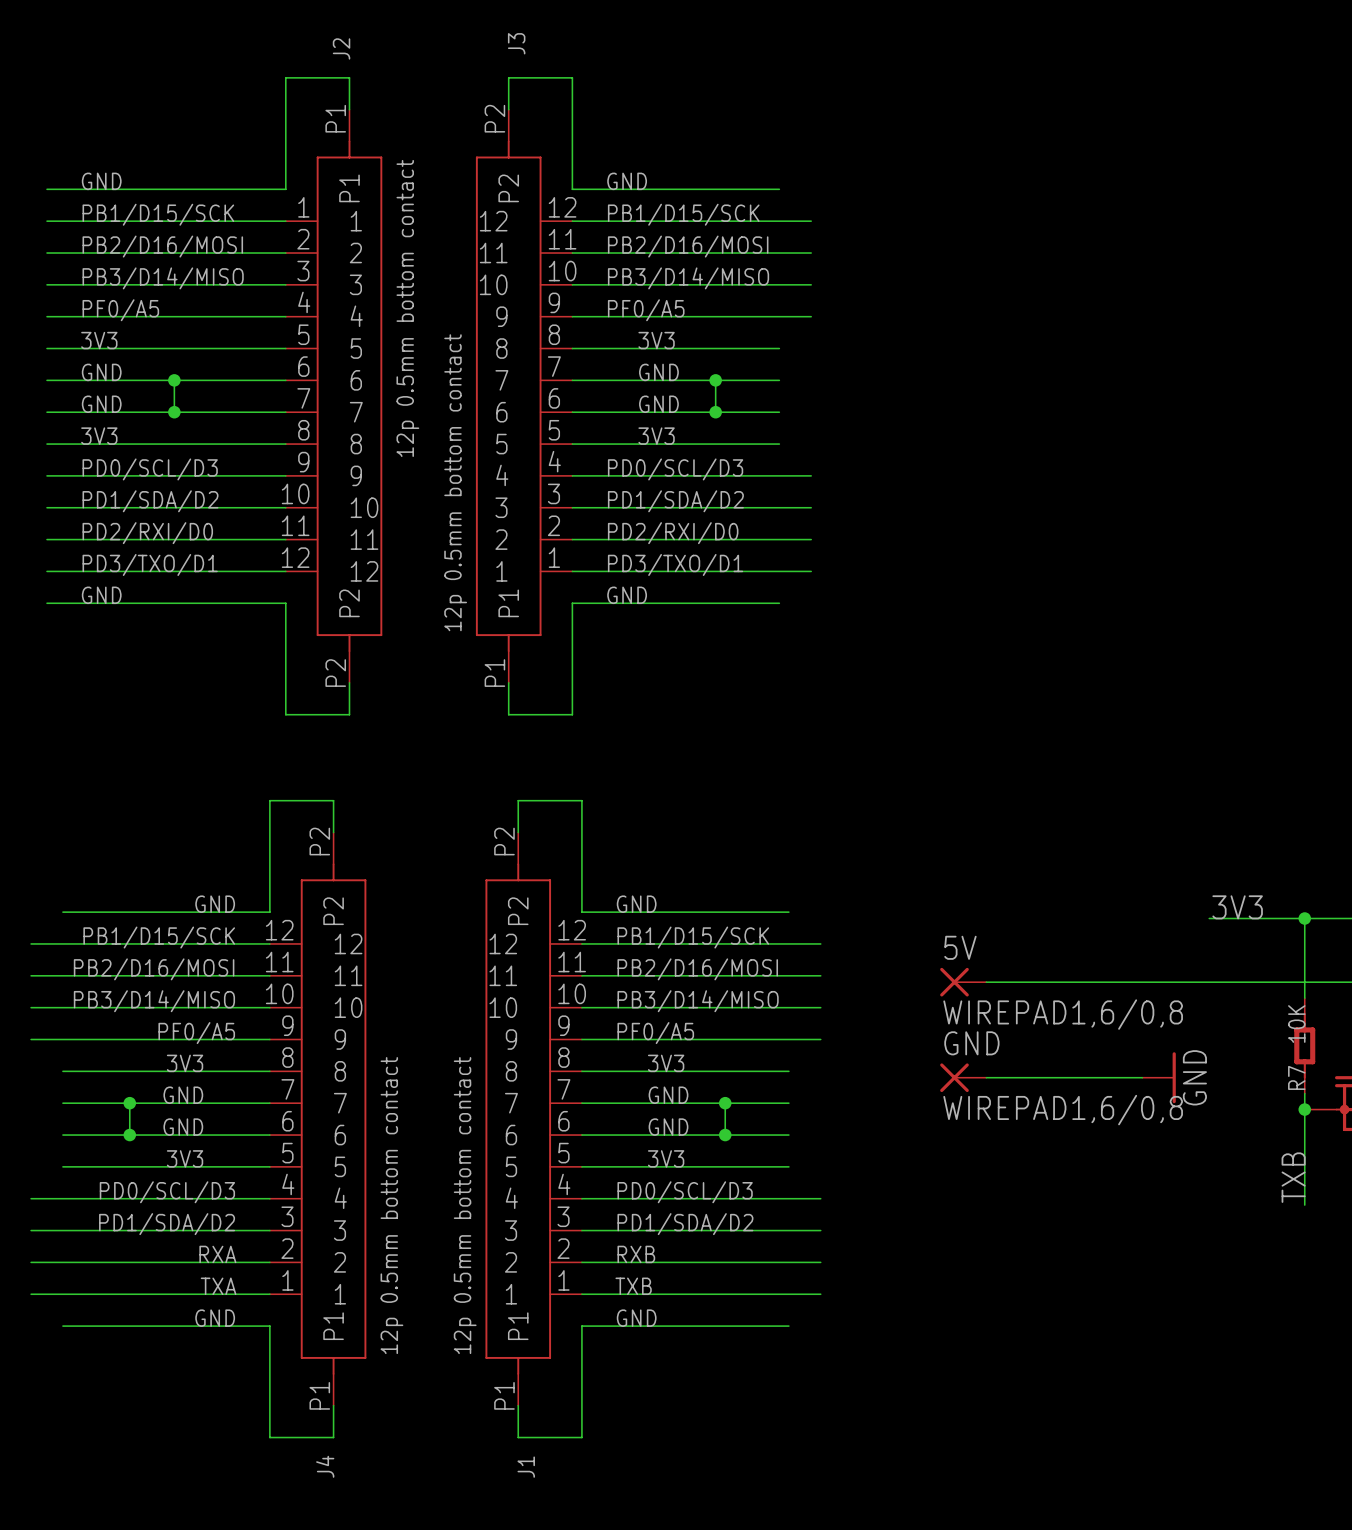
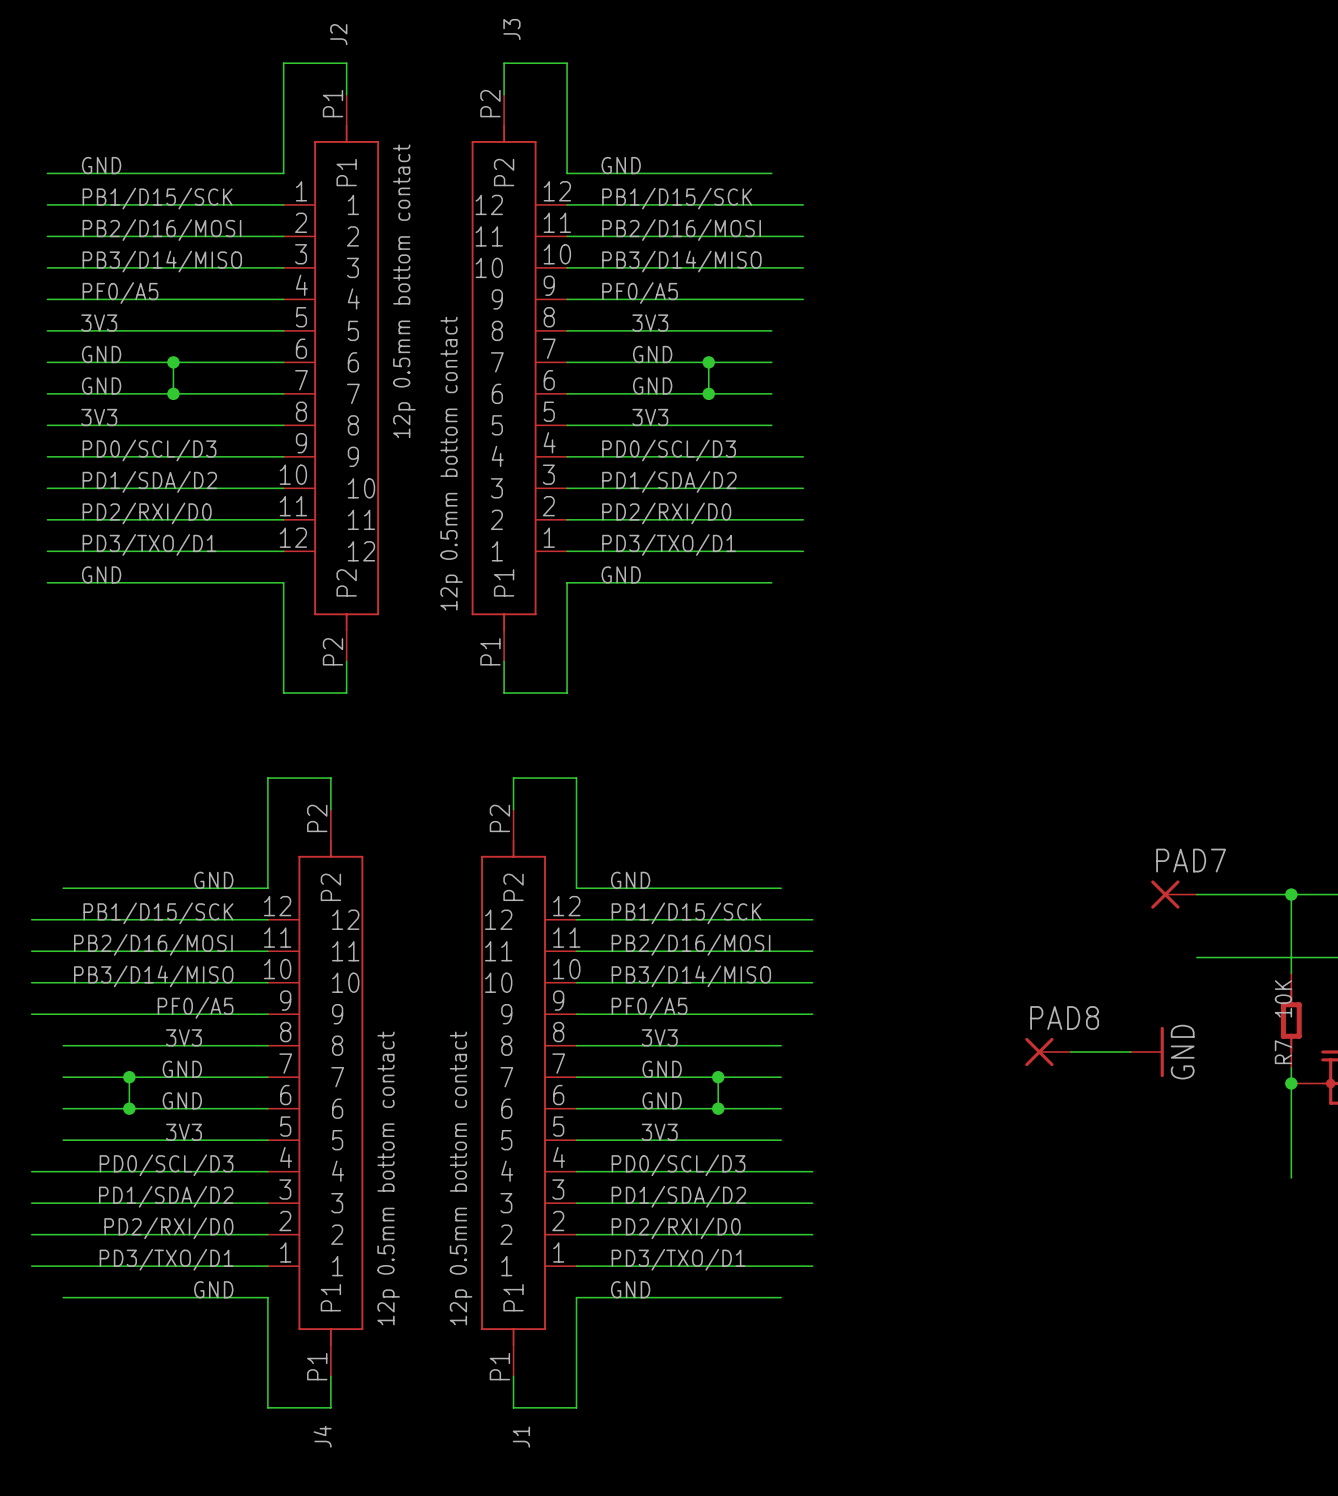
label: 3V3 (1237, 907) -> none
PAD7: none -> (1174, 894)
5V: WIREPAD1,6/0,8 (963, 982) -> none
wire: (986, 982) (1209, 982) -> none
GND: WIREPAD1,6/0,8 (963, 1077) -> none
wire: (986, 1077) (1081, 1077) -> none
PAD8: none -> (1048, 1052)
label: TXB (1293, 1177) -> none
label: RXA (217, 1254) -> PD2/RXI/D0 (168, 1228)
label: RXB (636, 1254) -> PD2/RXI/D0 (676, 1228)
label: TXA (218, 1286) -> PD3/TXO/D1 (166, 1259)
label: TXB (633, 1286) -> PD3/TXO/D1 (678, 1259)

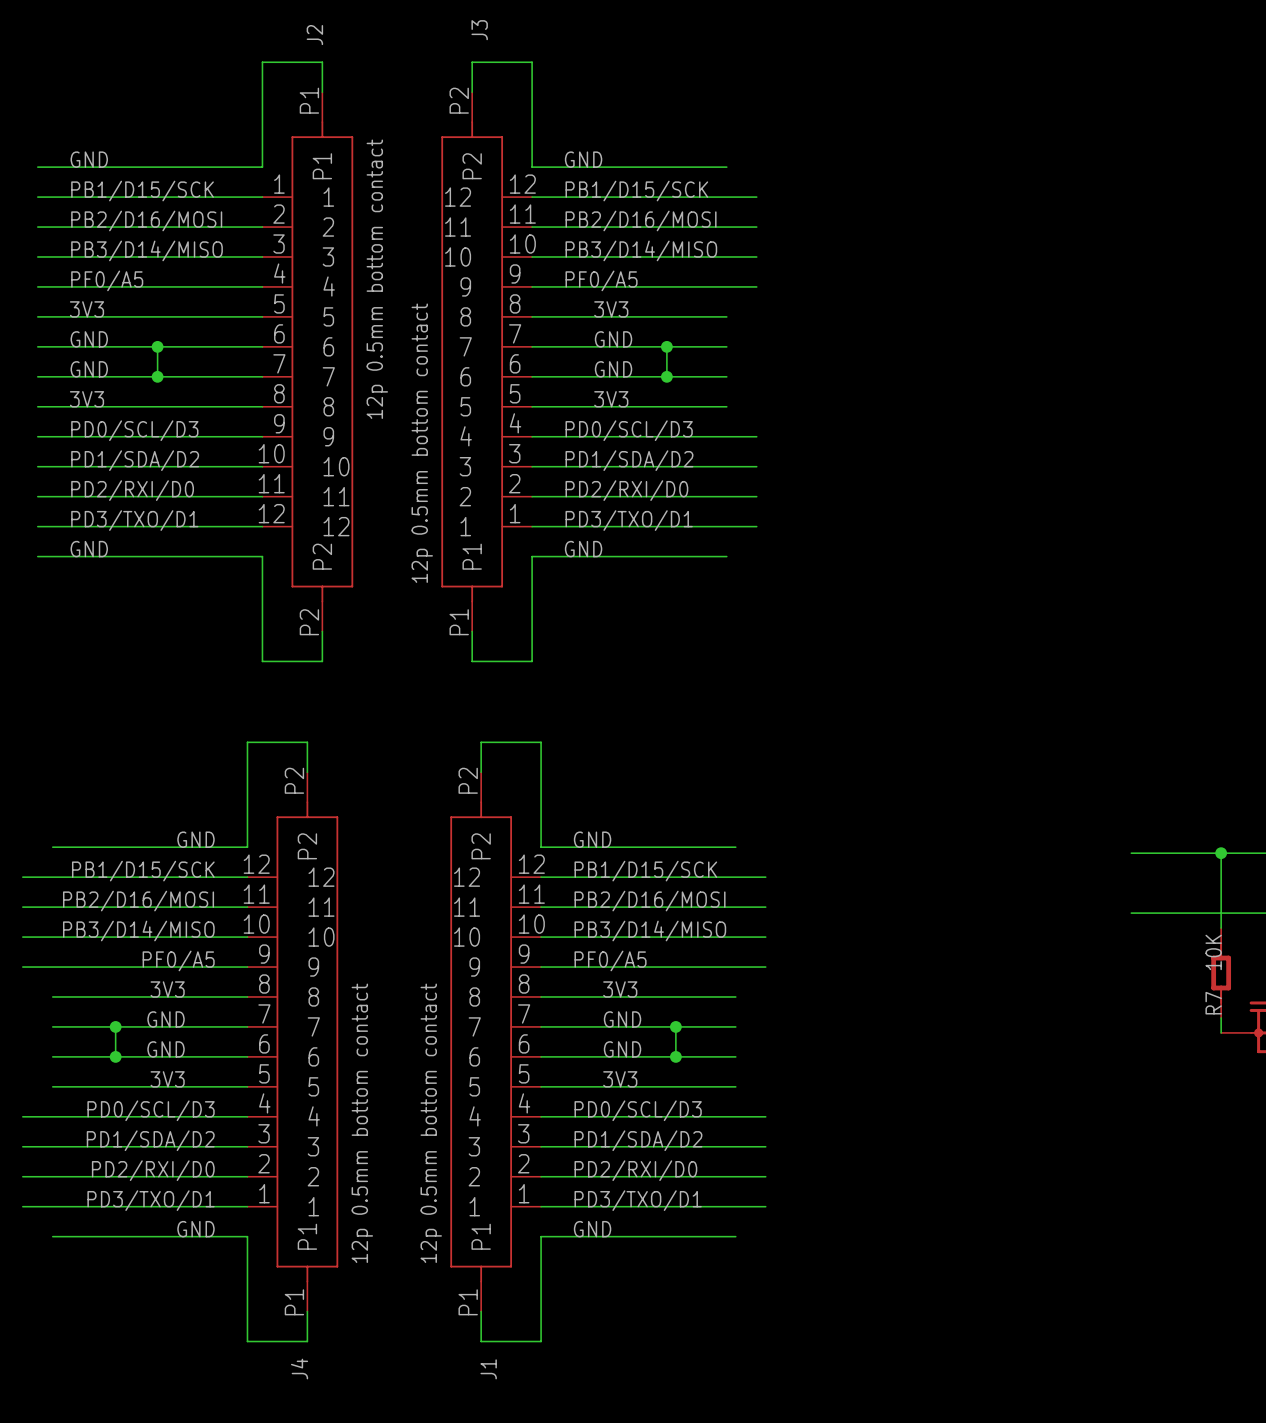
PAD7: (1174, 894) -> none
PAD8: (1048, 1052) -> none
wire: (1070, 1052) (1130, 1052) -> none
power symbol: GND (1147, 1052) -> none
wire: (1291, 1083) (1291, 1177) -> none
junction: (1291, 1083) -> none

